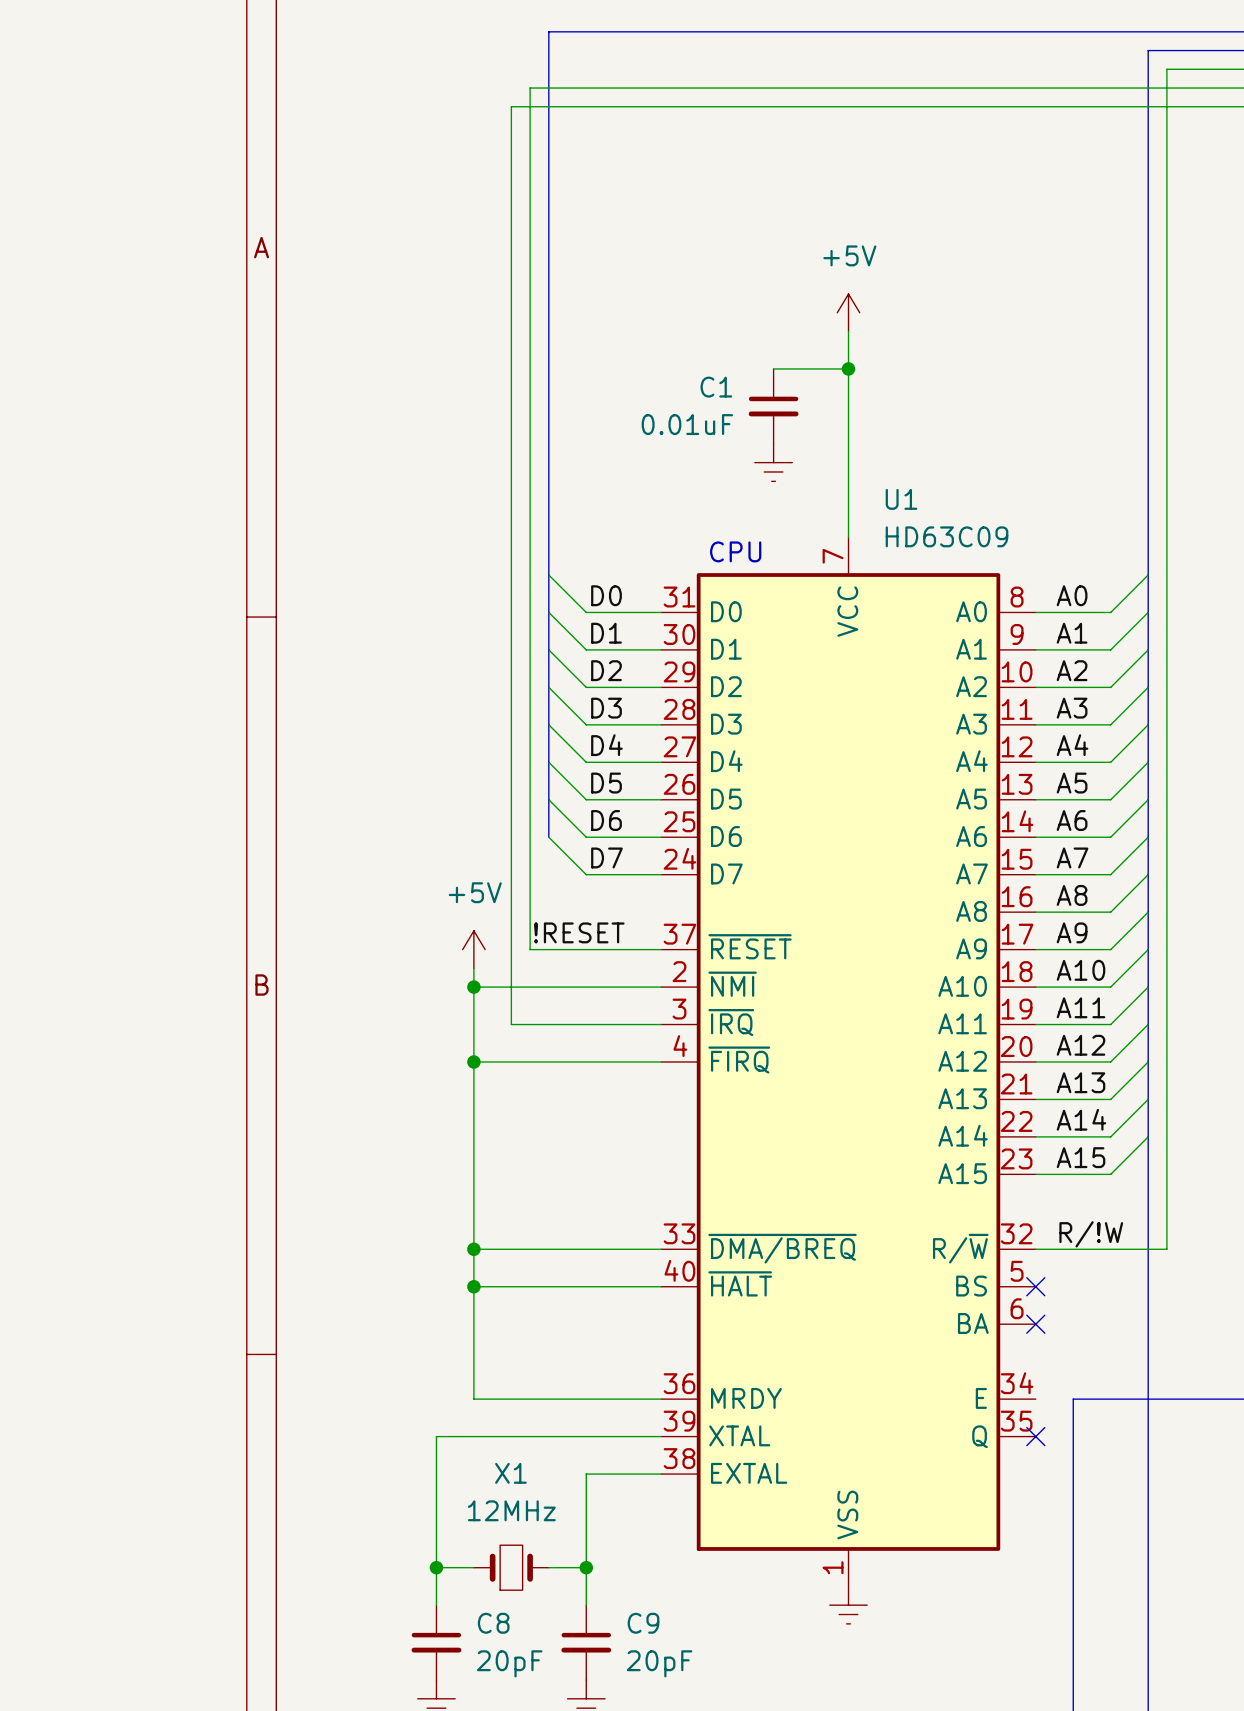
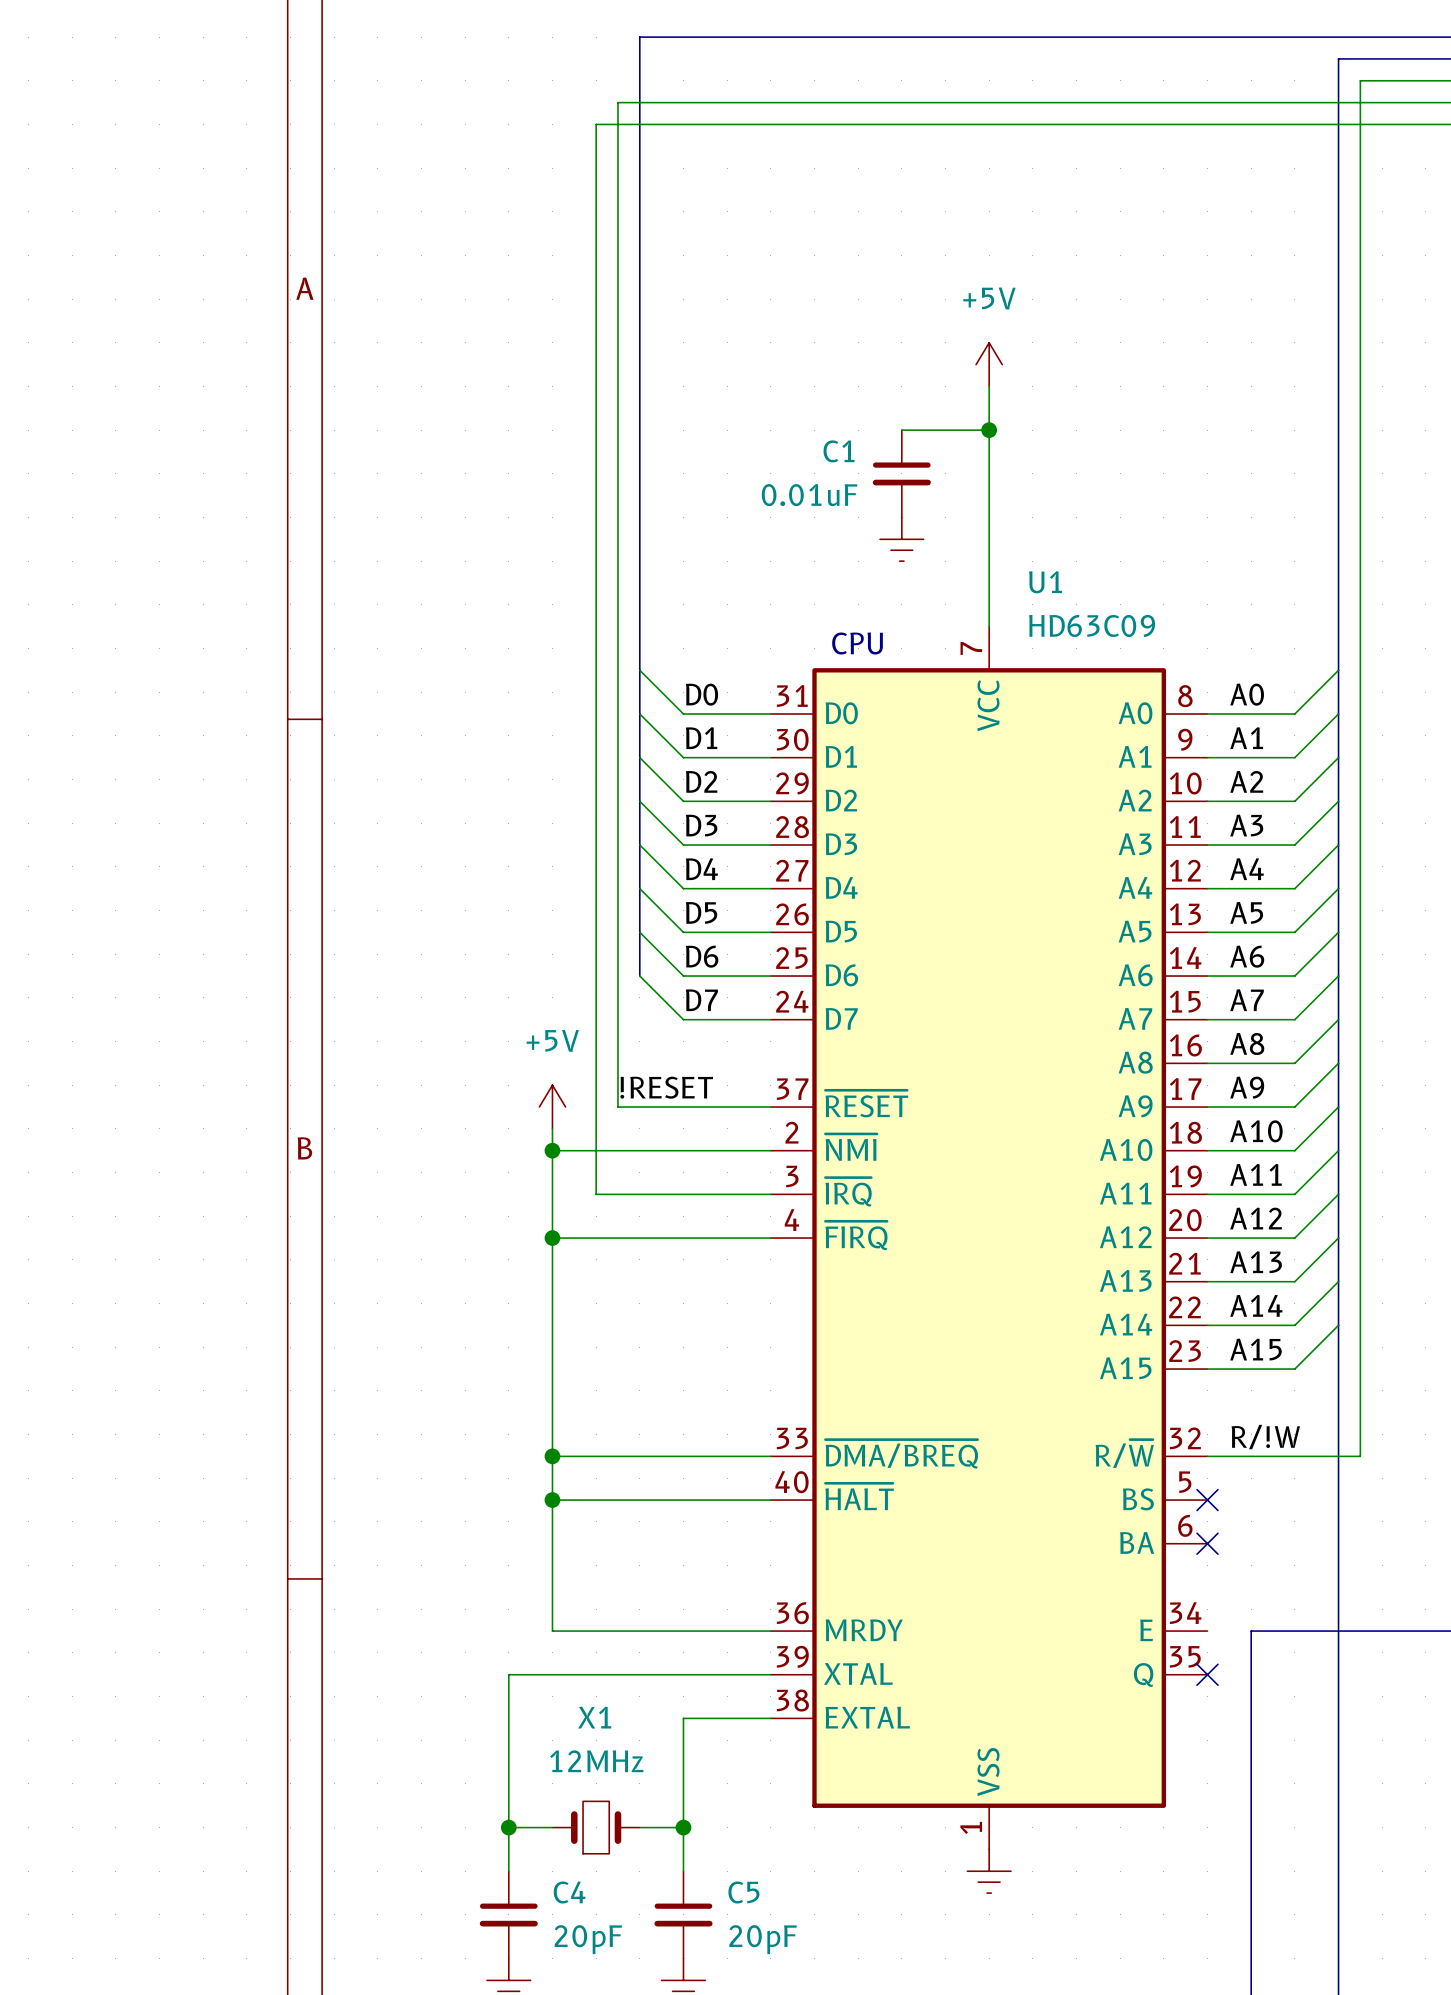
C8 name: C8 (493, 1623) -> C4 (569, 1892)
C9 name: C9 (643, 1623) -> C5 (743, 1892)

